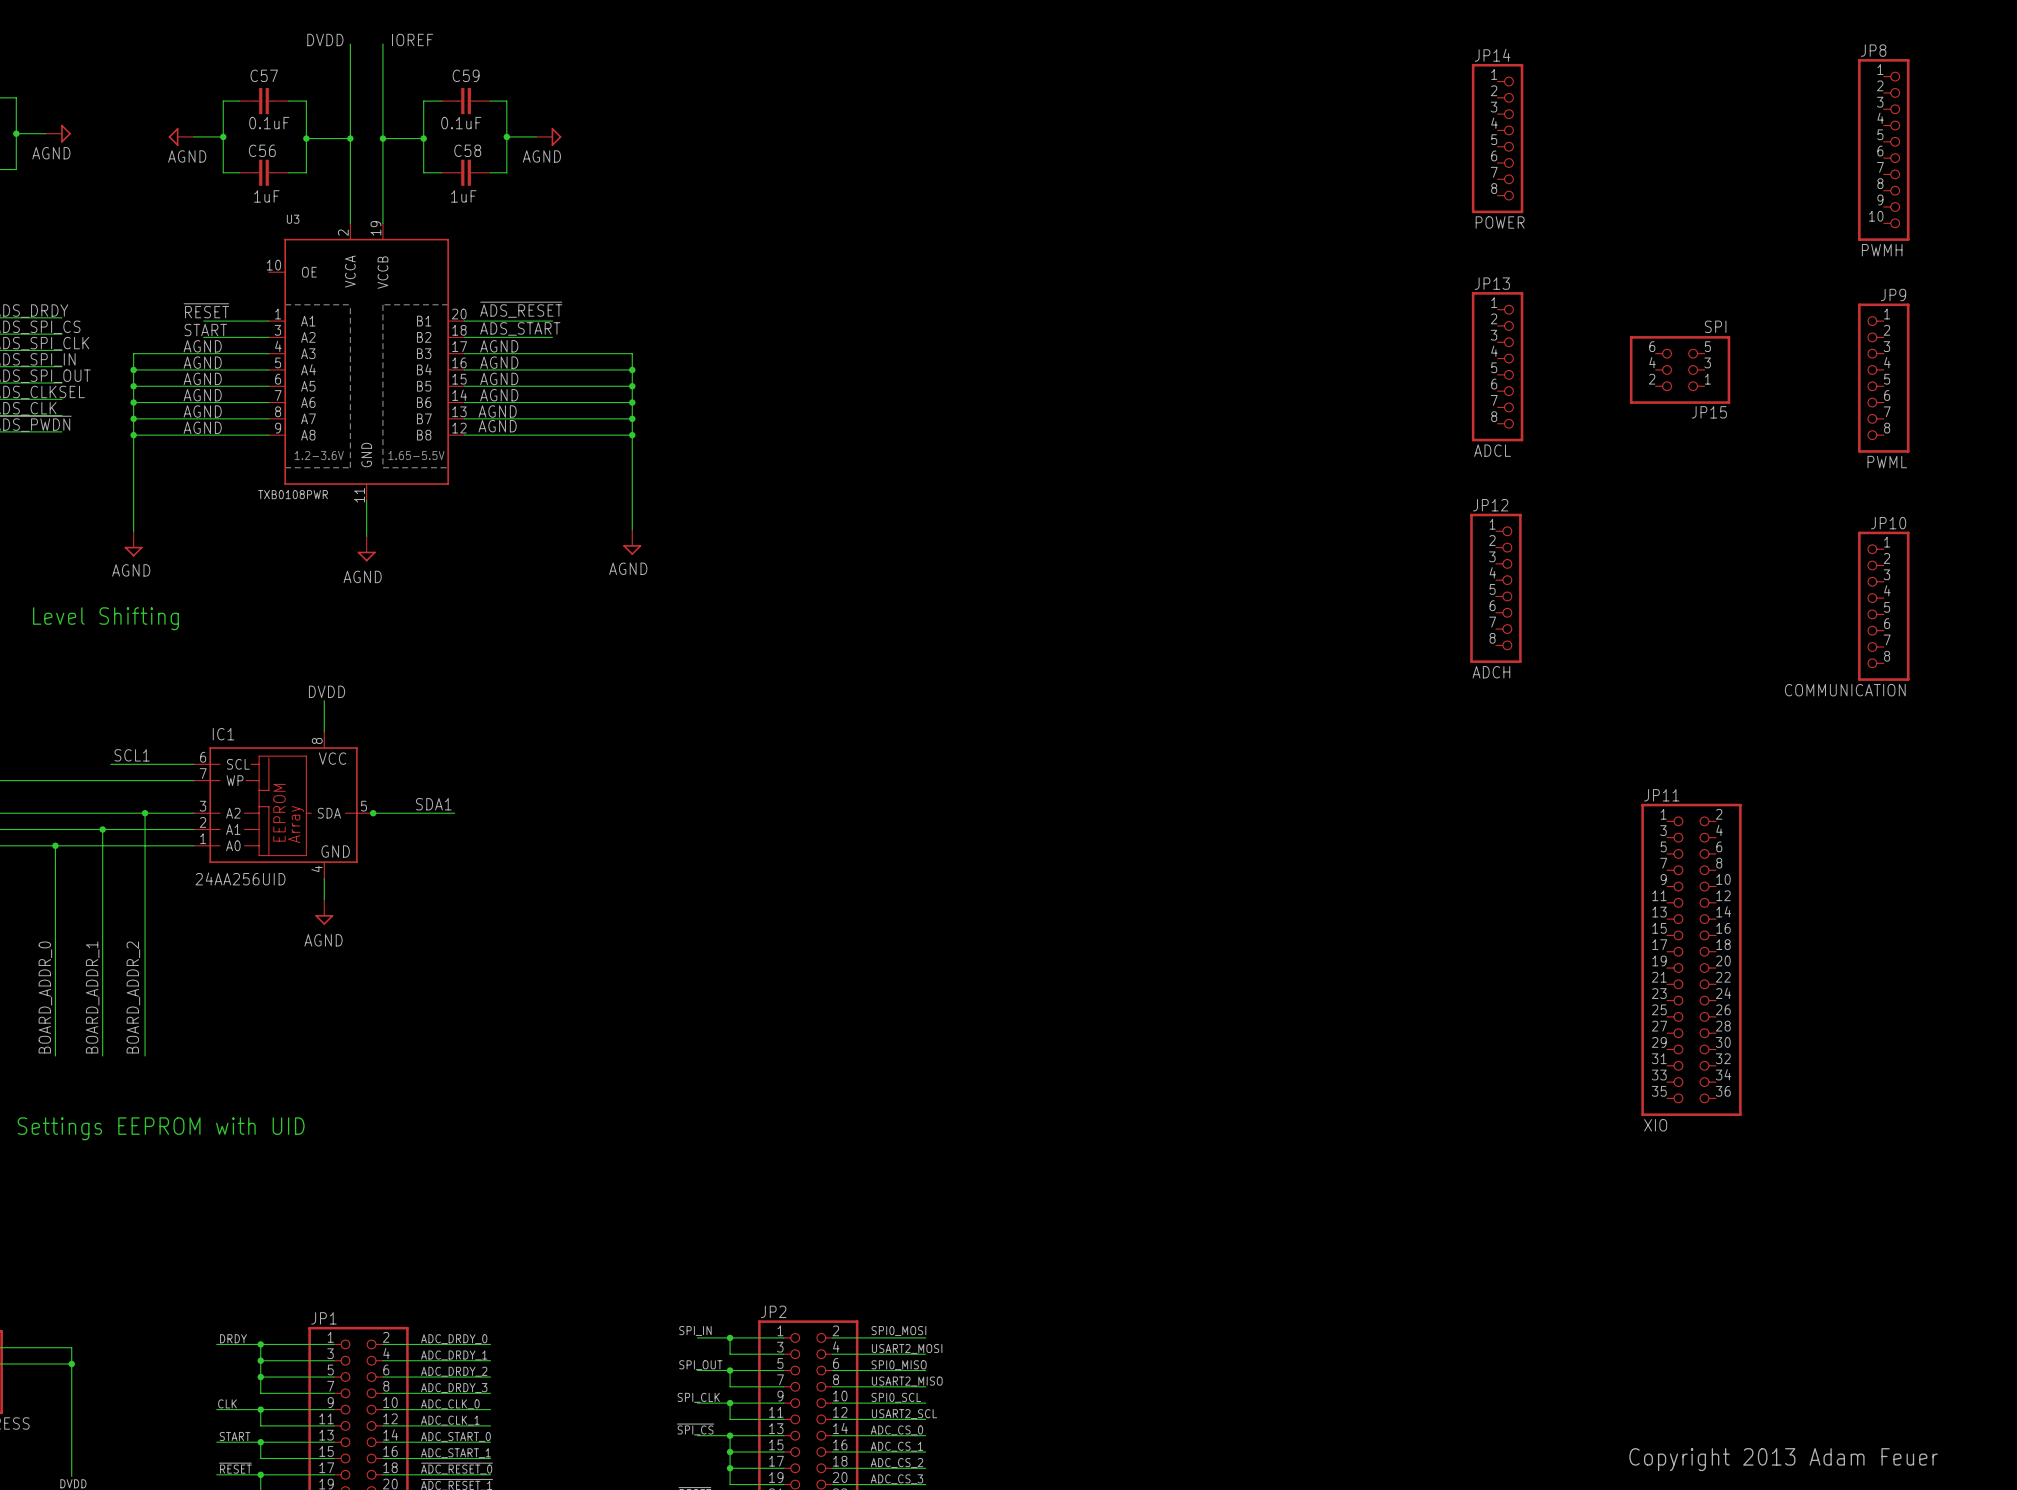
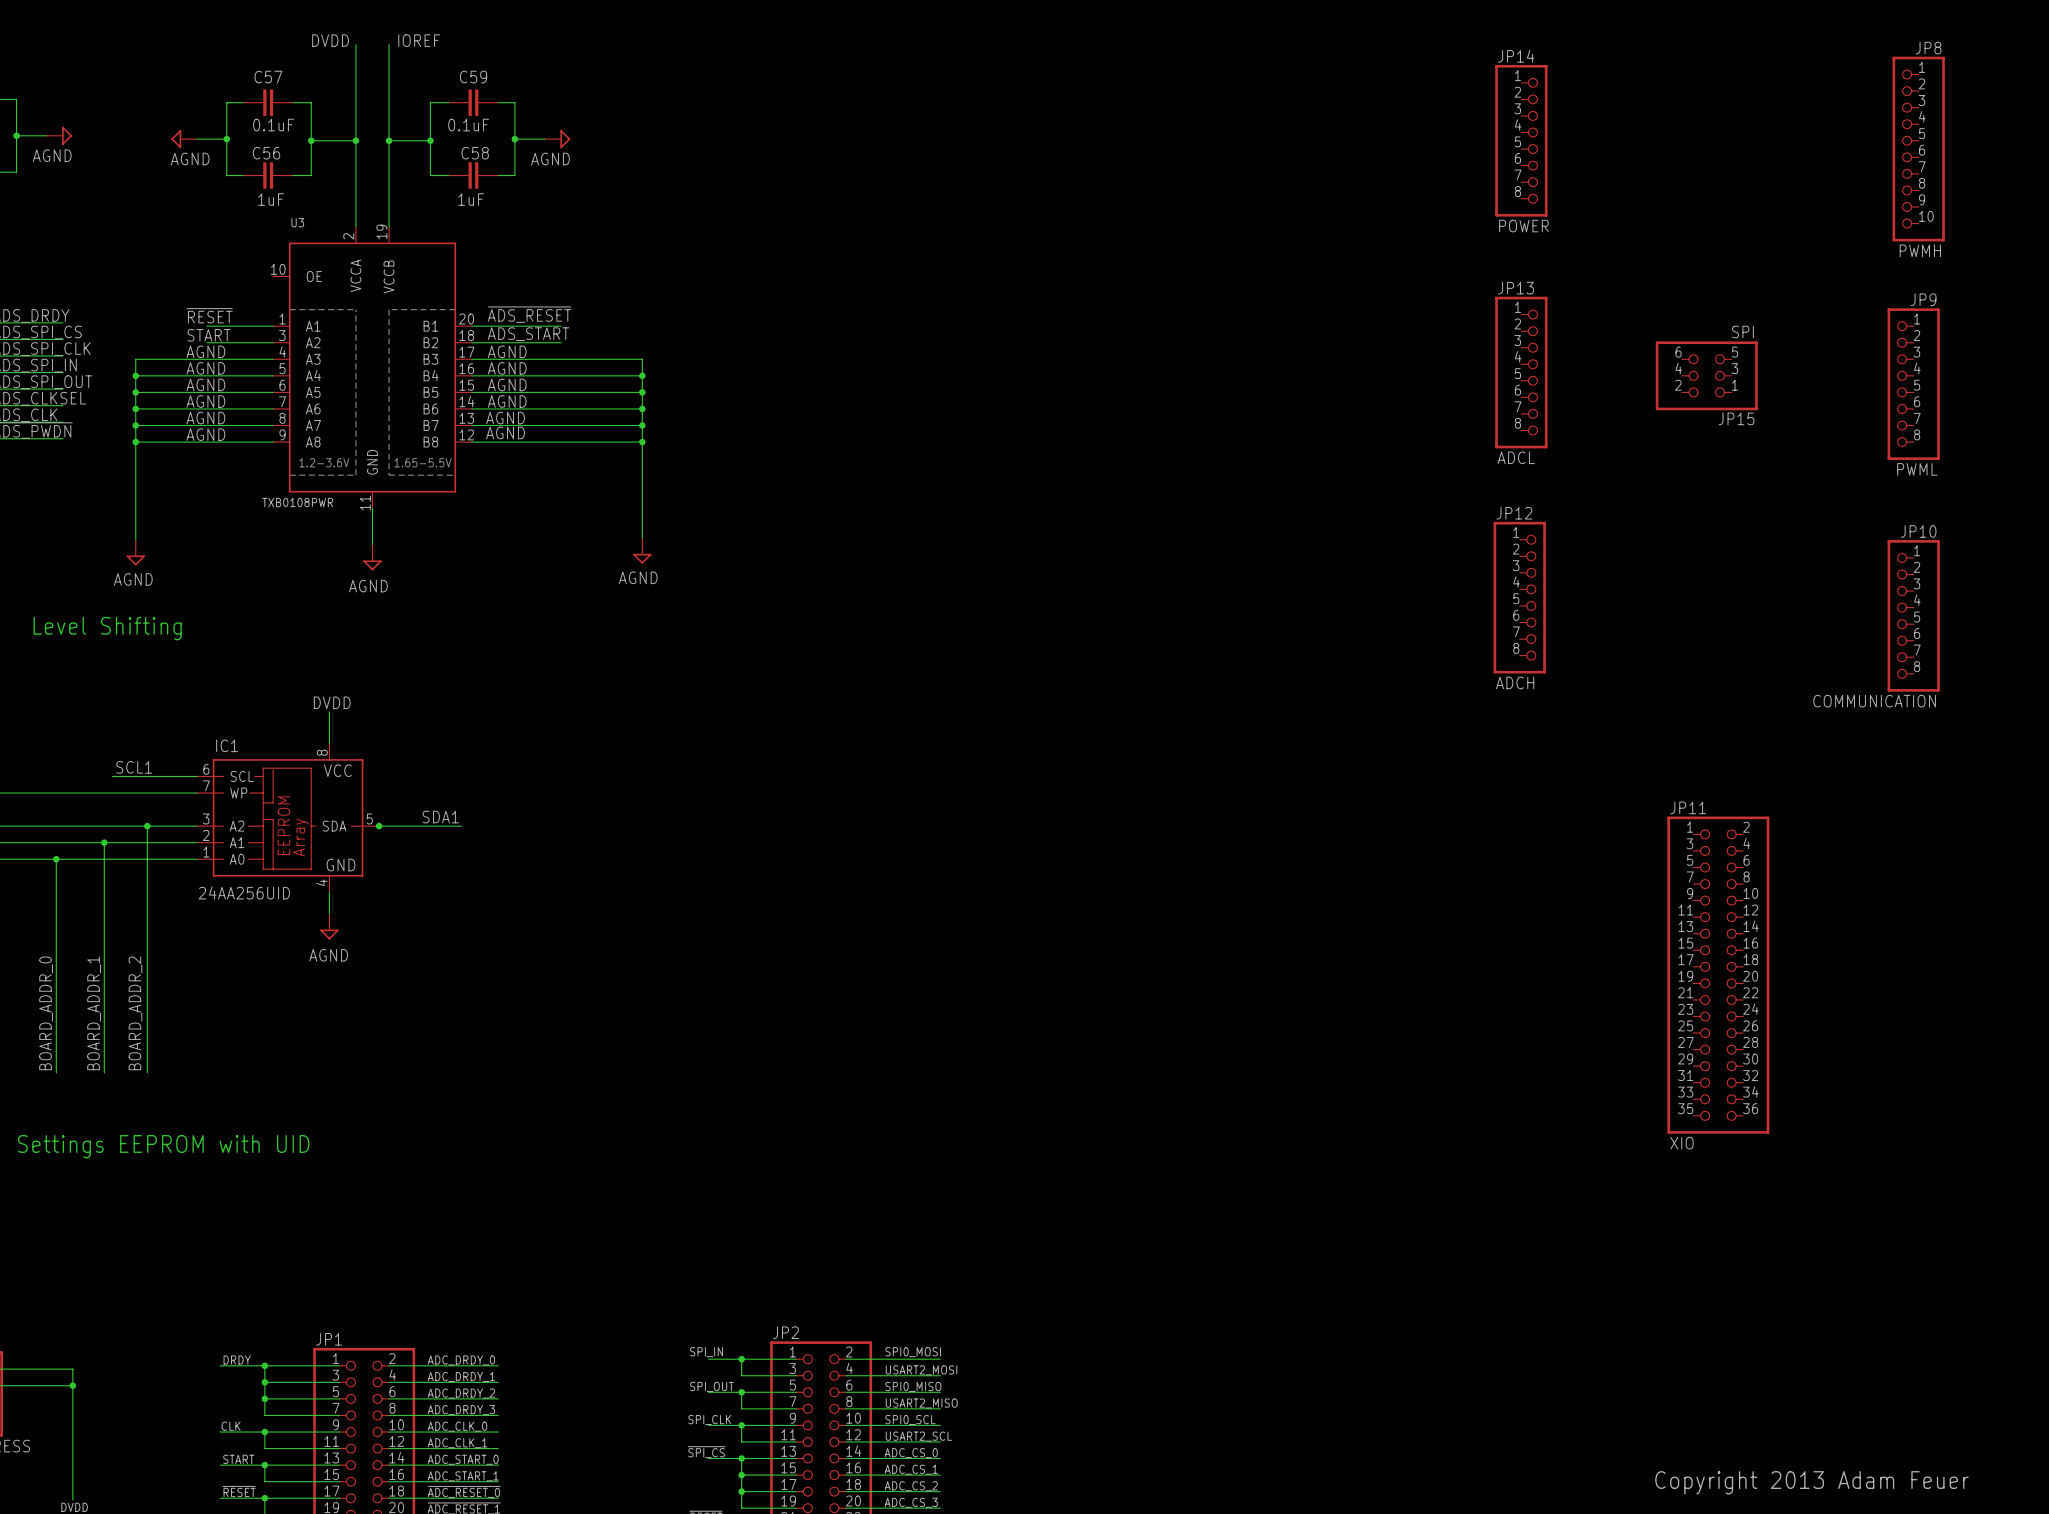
JP8 flip: as is (1883, 149) -> left-right (1918, 149)

